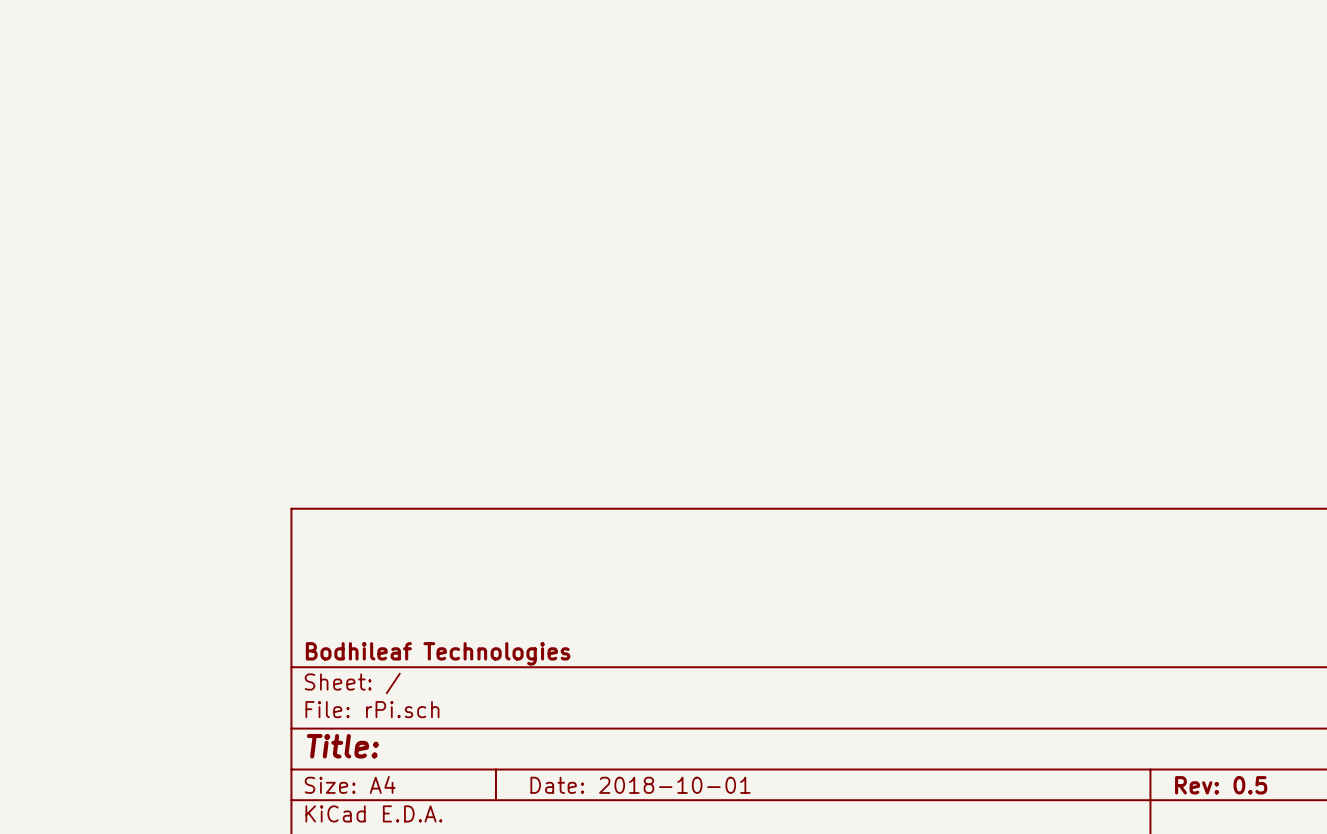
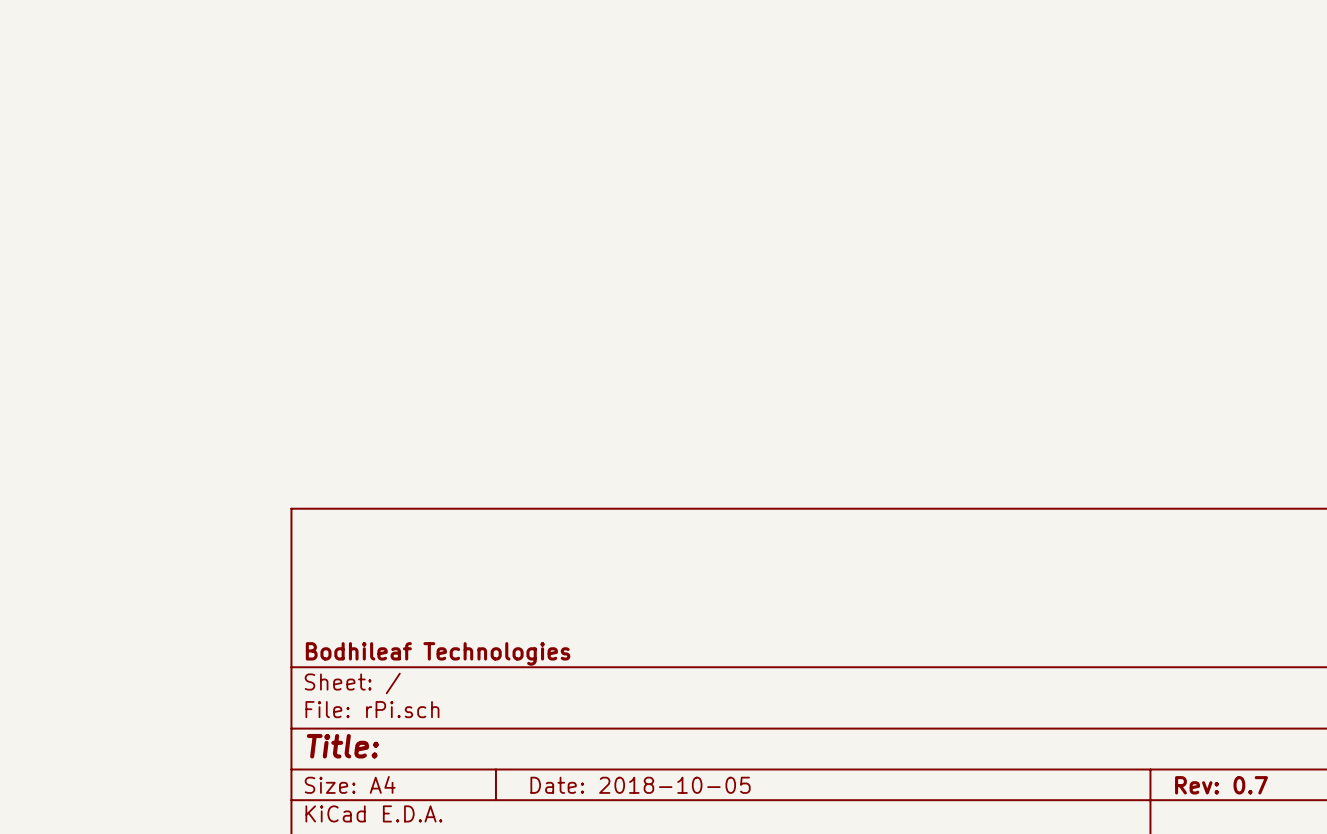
title block: Date: 2018-10-01 (640, 785) -> Date: 2018-10-05 (640, 785)
title block: Rev: 0.5 (1221, 785) -> Rev: 0.7 (1221, 785)

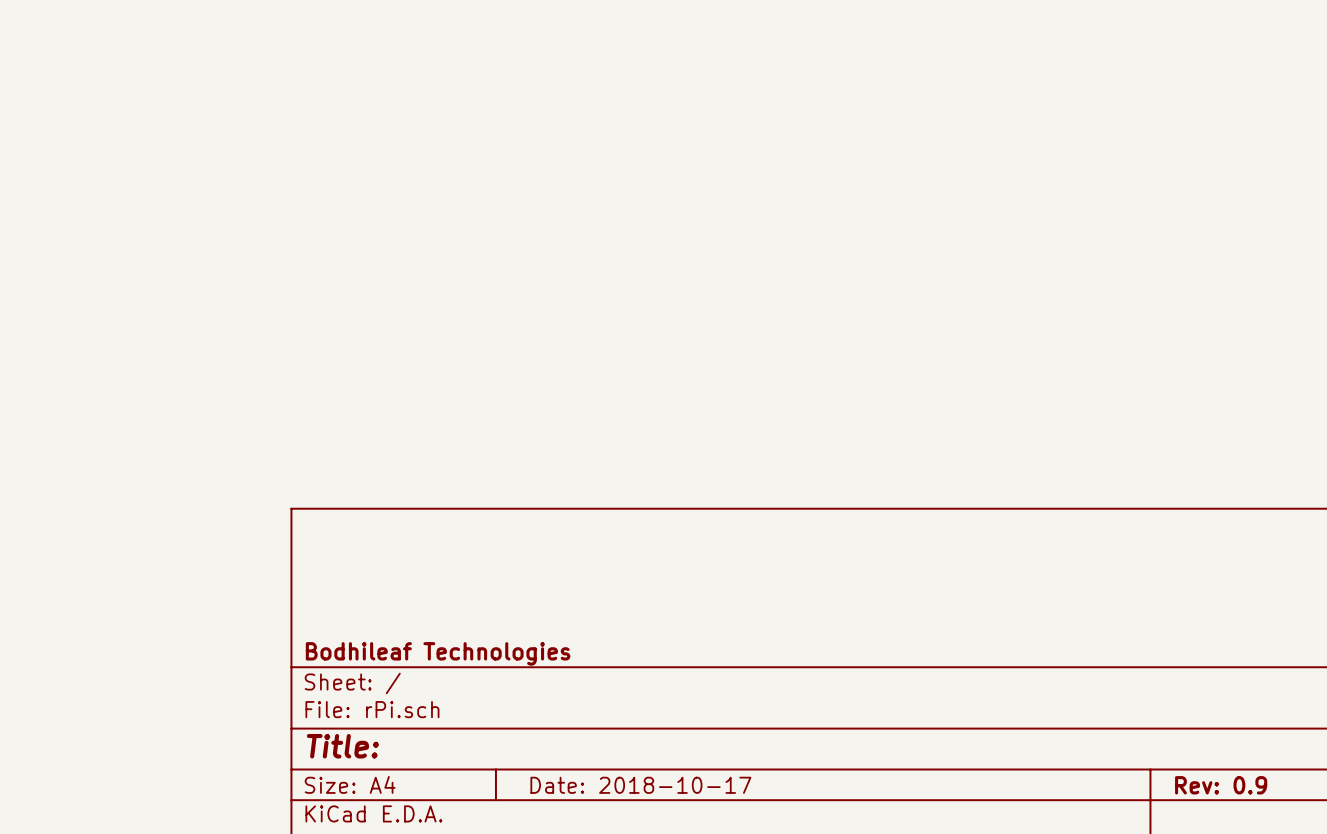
title block: Date: 2018-10-05 (640, 785) -> Date: 2018-10-17 (640, 785)
title block: Rev: 0.7 (1221, 785) -> Rev: 0.9 (1221, 785)

